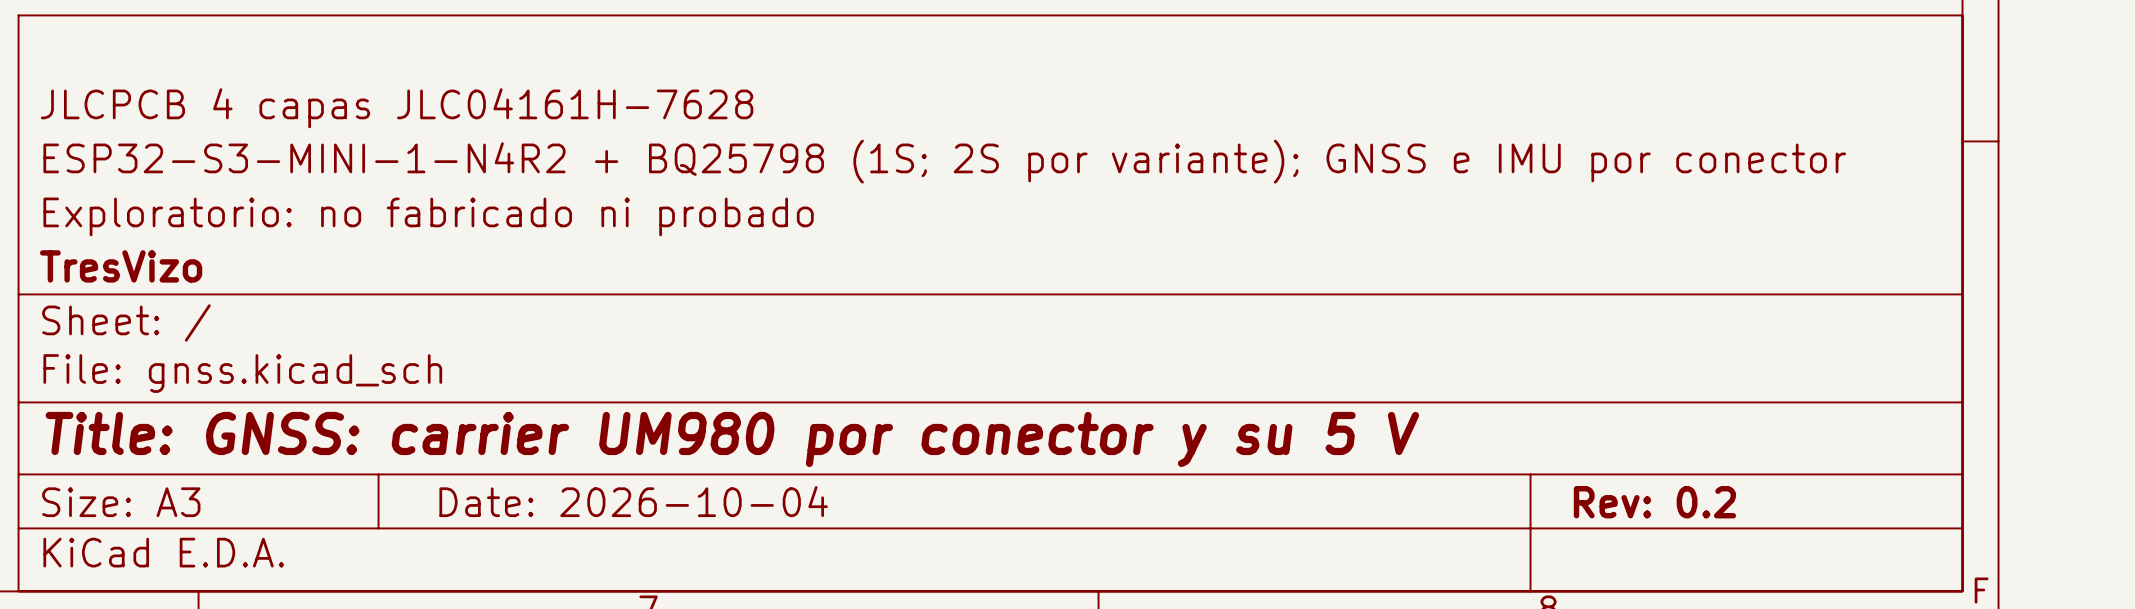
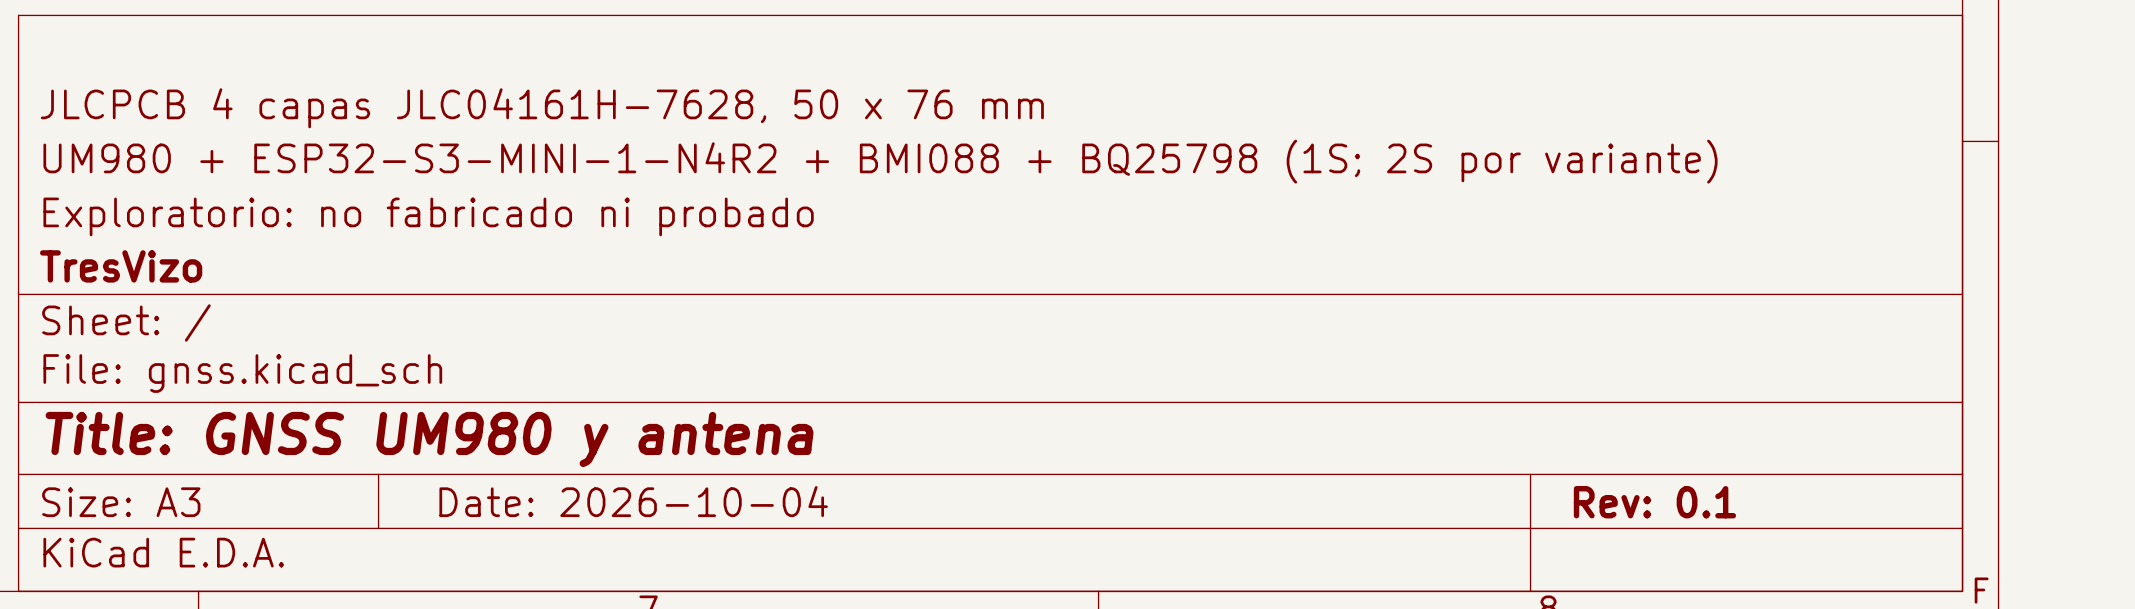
title block: JLCPCB 4 capas JLC04161H-7628 (397, 108) -> JLCPCB 4 capas JLC04161H-7628, 50 x 76 mm (542, 108)
title block: ESP32-S3-MINI-1-N4R2 + BQ25798 (1S; 2S por variante); GNSS e IMU por conector (944, 161) -> UM980 + ESP32-S3-MINI-1-N4R2 + BMI088 + BQ25798 (1S; 2S por variante) (880, 161)
title block: Title: GNSS: carrier UM980 por conector y su 5 V (732, 439) -> Title: GNSS UM980 y antena (429, 439)
title block: Rev: 0.2 (1654, 502) -> Rev: 0.1 (1654, 502)

